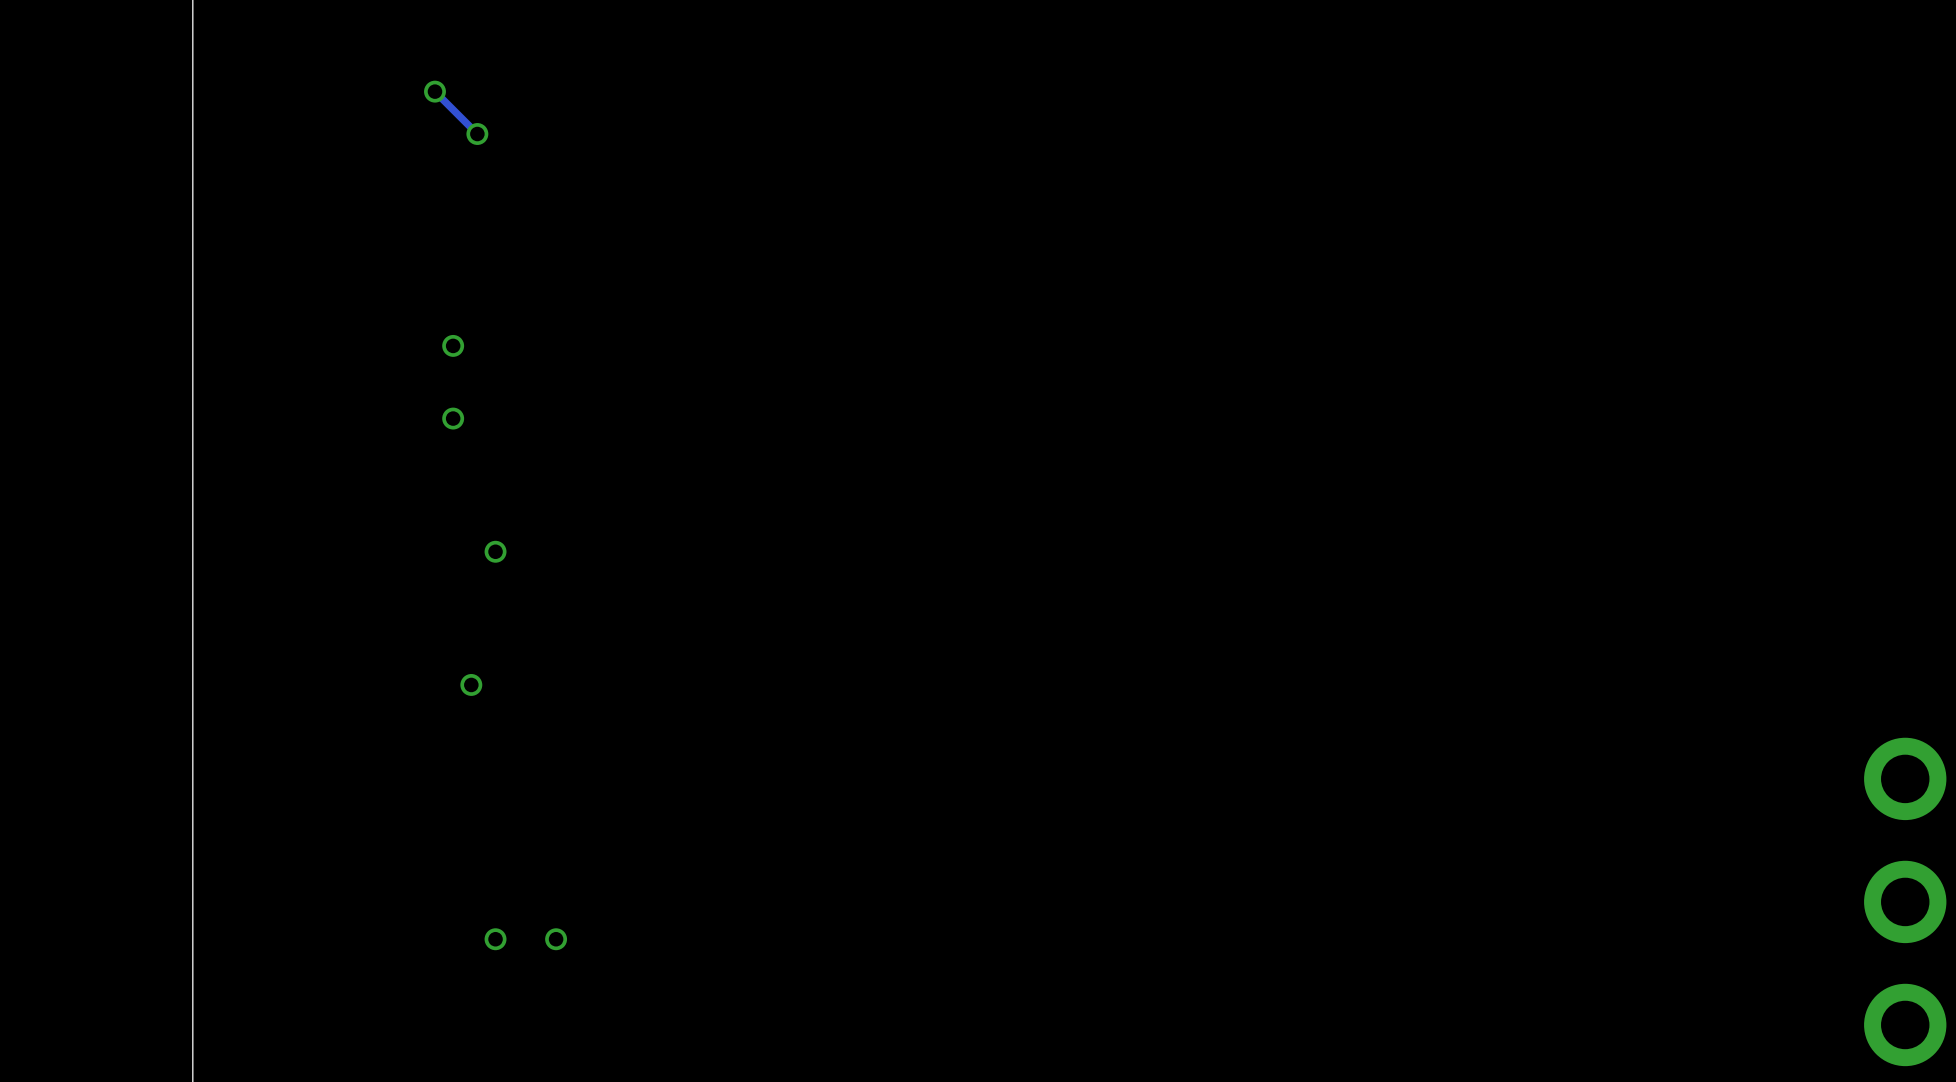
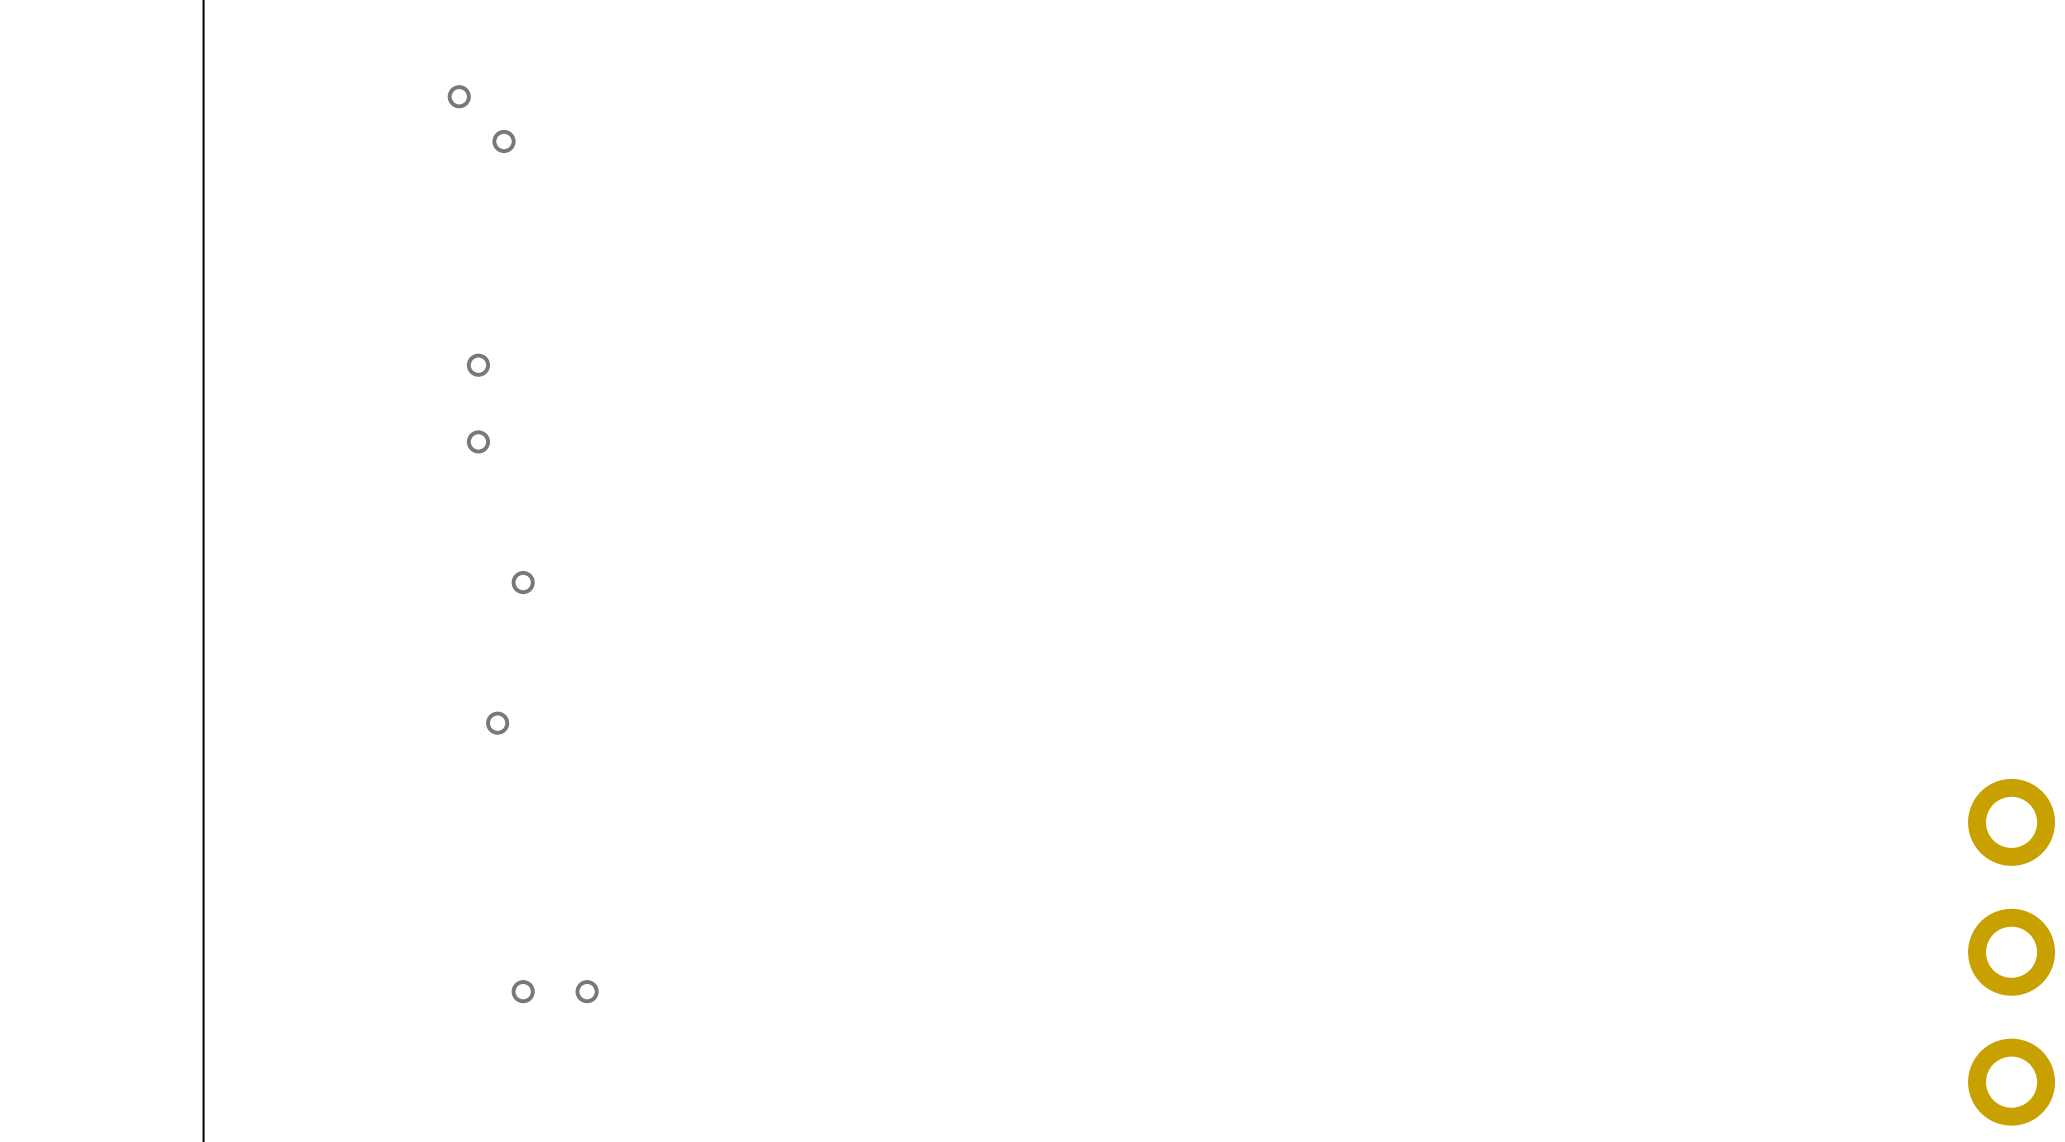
track: (434, 91) (477, 134) -> none

